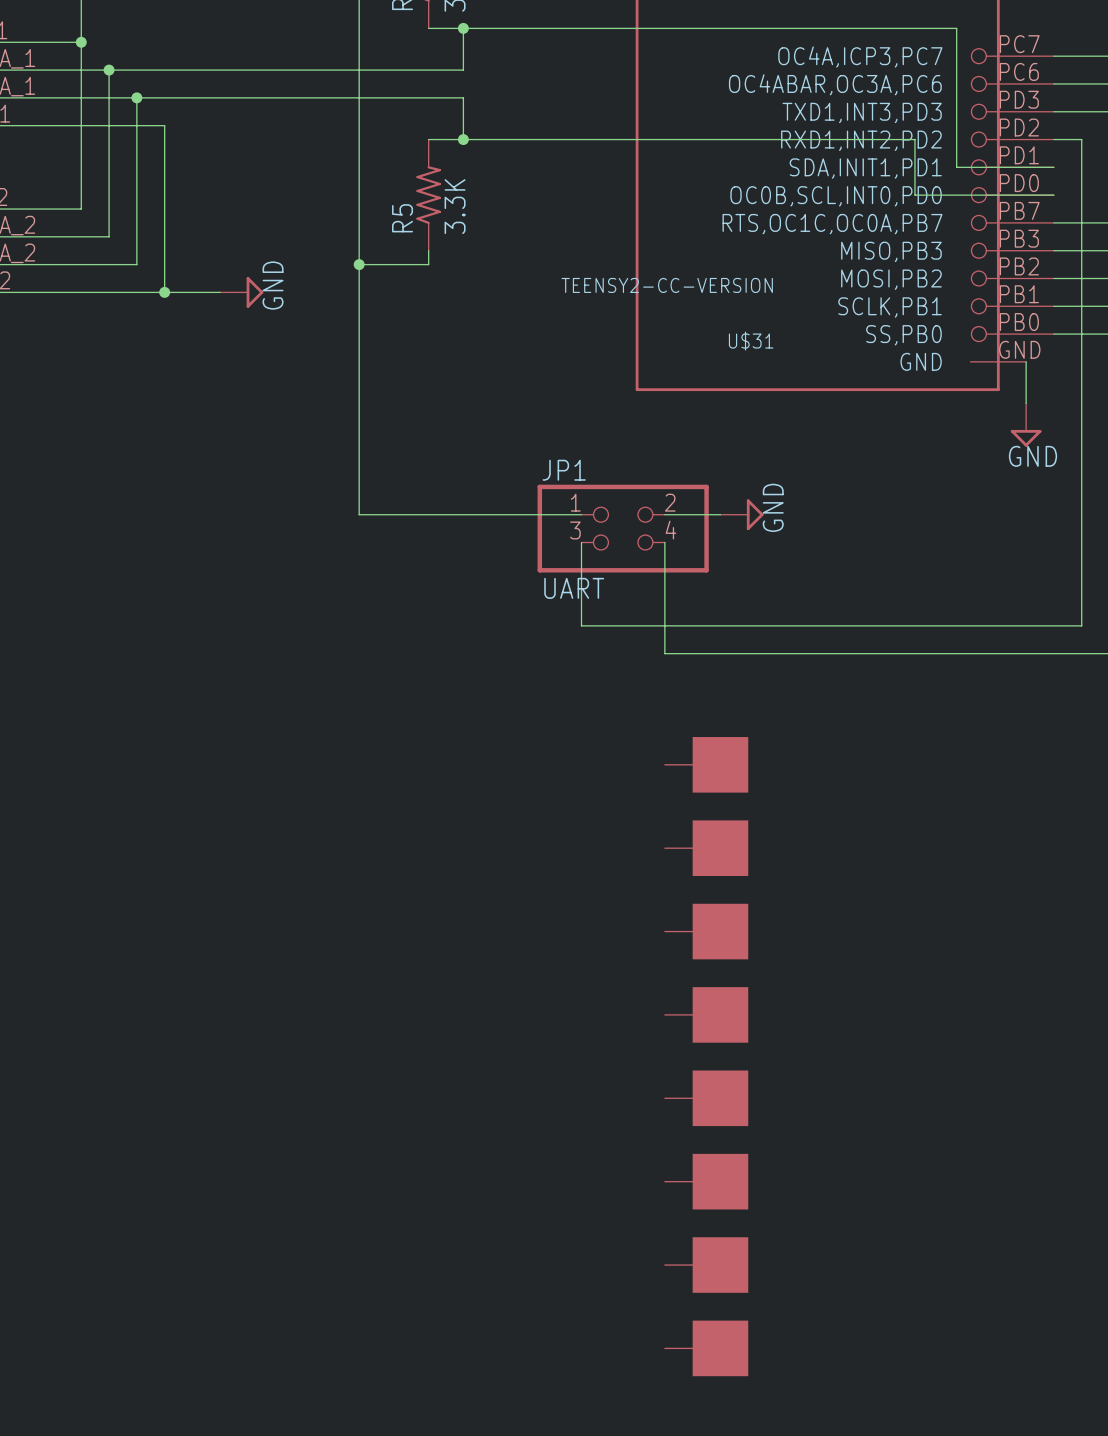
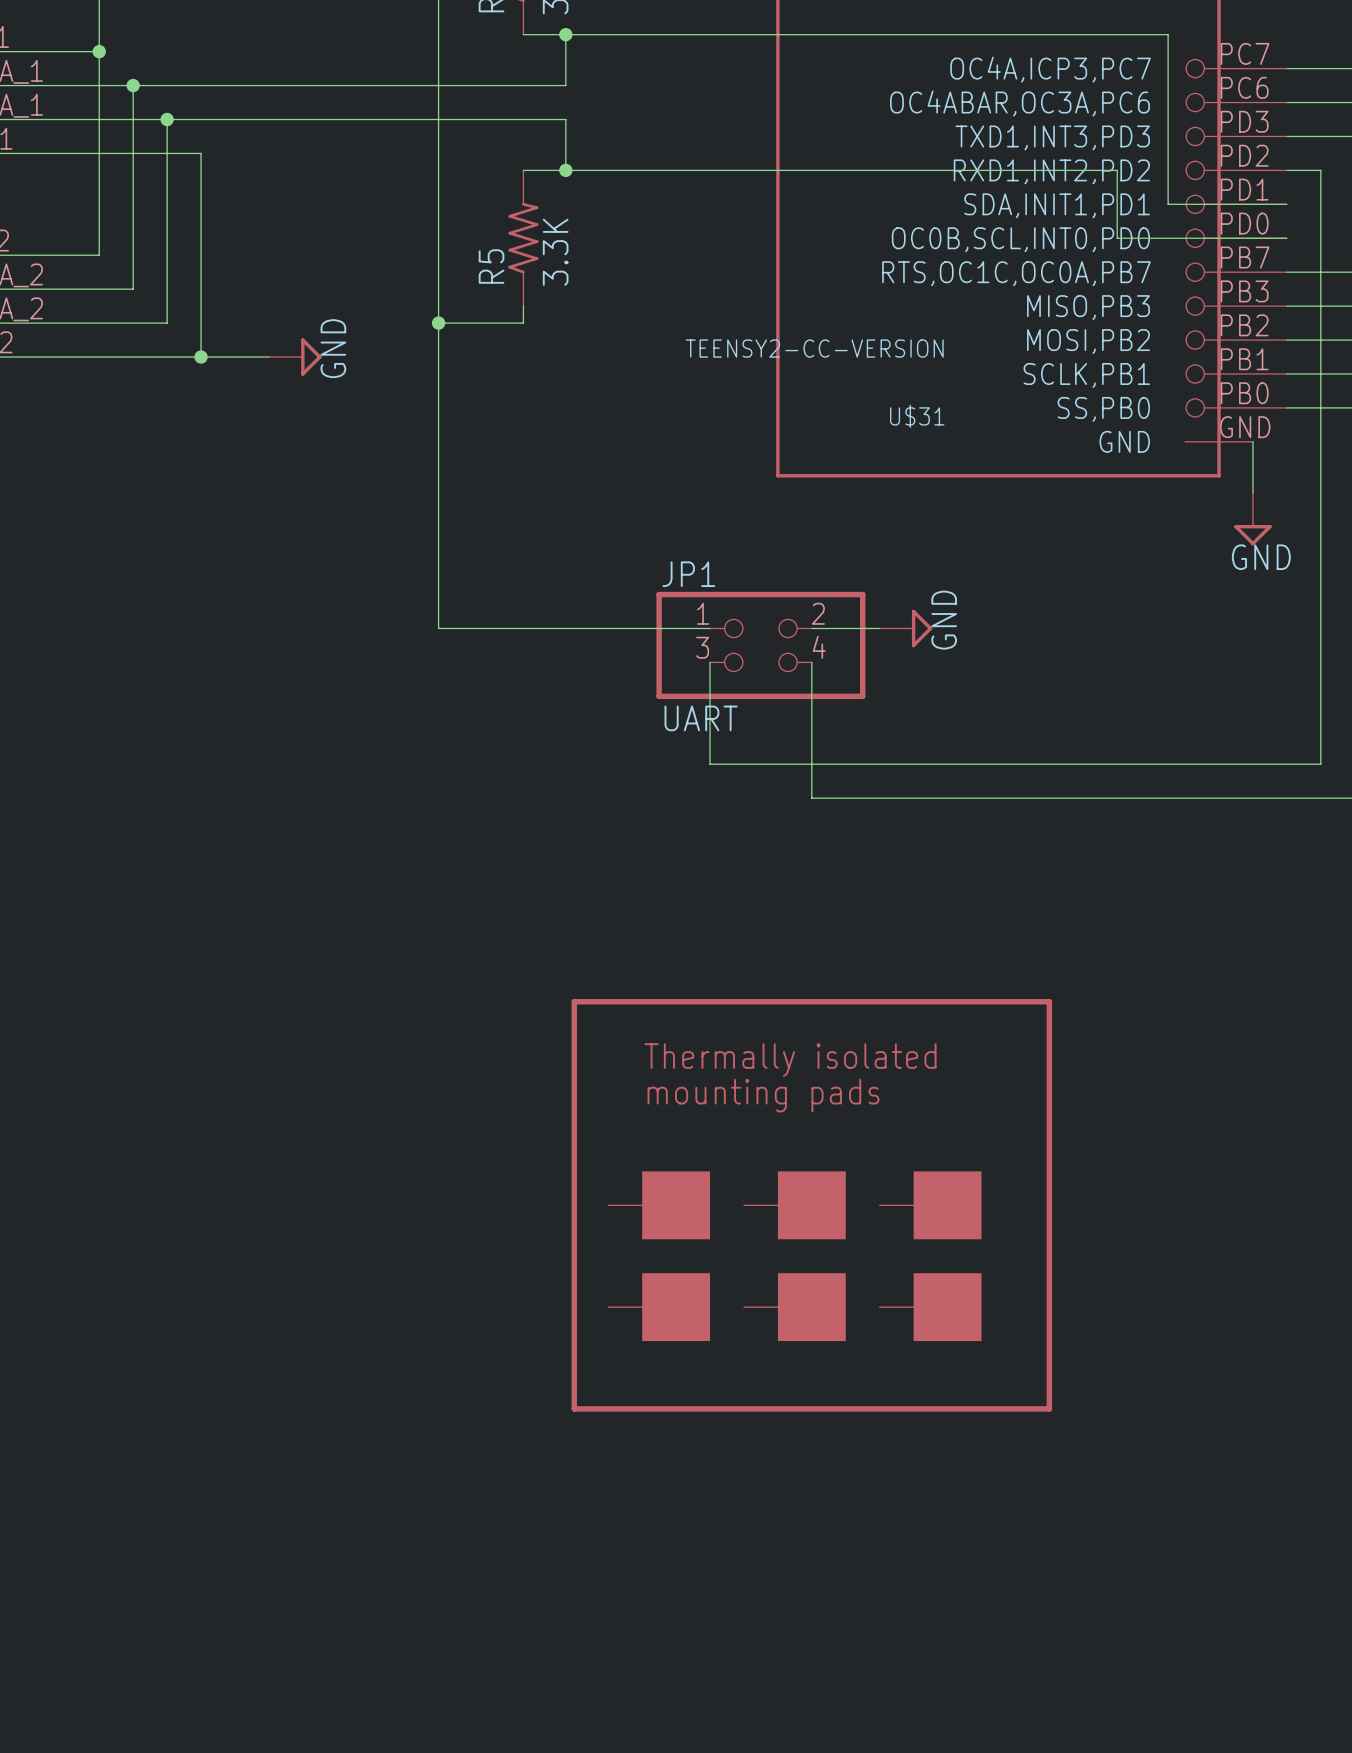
part: (706, 764) -> none
line: none -> (574, 1001) (1049, 1001) (1049, 1408) (574, 1408) (574, 1001)
part: (706, 848) -> none
text: none -> Thermally isolated (790, 1059)
text: none -> mounting pads (763, 1095)
part: (706, 931) -> none
part: none -> (659, 1205)
part: none -> (794, 1205)
part: none -> (930, 1205)
part: (706, 1014) -> none
part: none -> (659, 1307)
part: none -> (794, 1307)
part: none -> (930, 1307)
part: (706, 1098) -> none
part: (706, 1181) -> none
part: (706, 1265) -> none
part: (706, 1348) -> none

